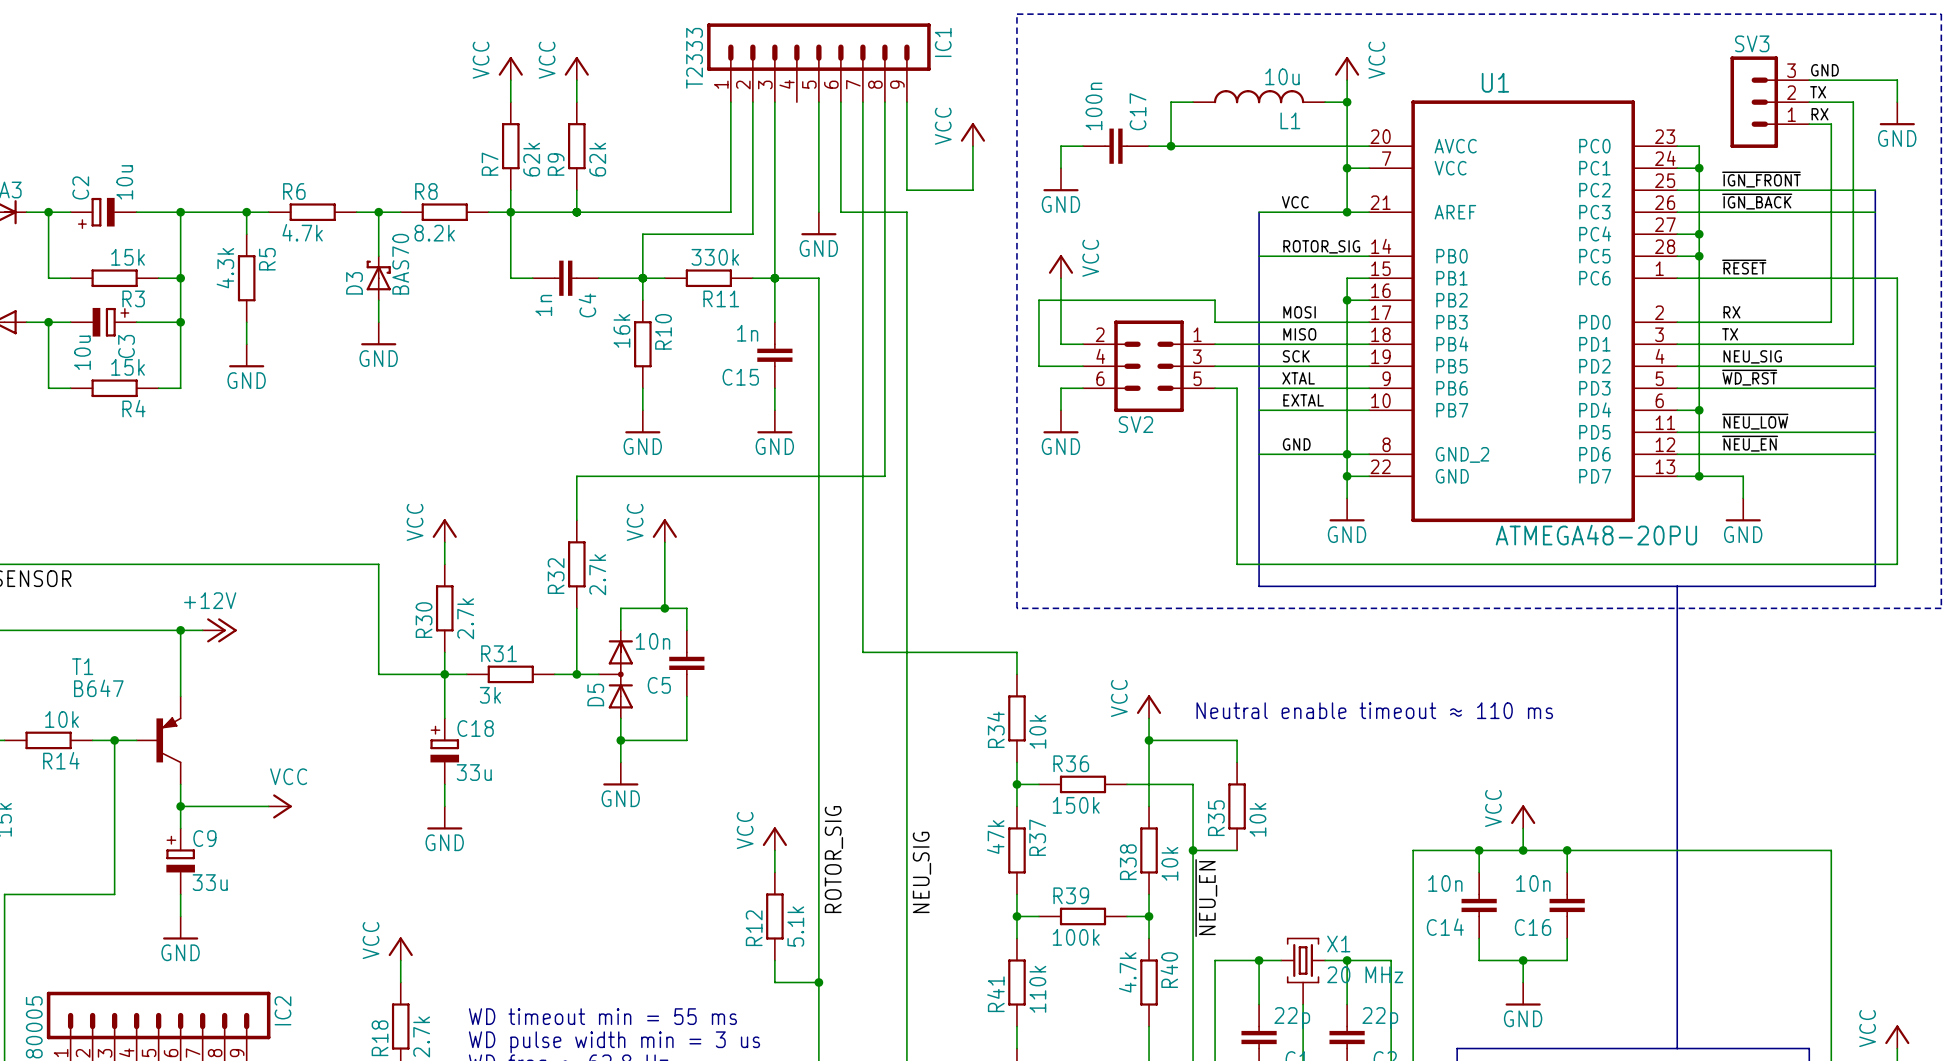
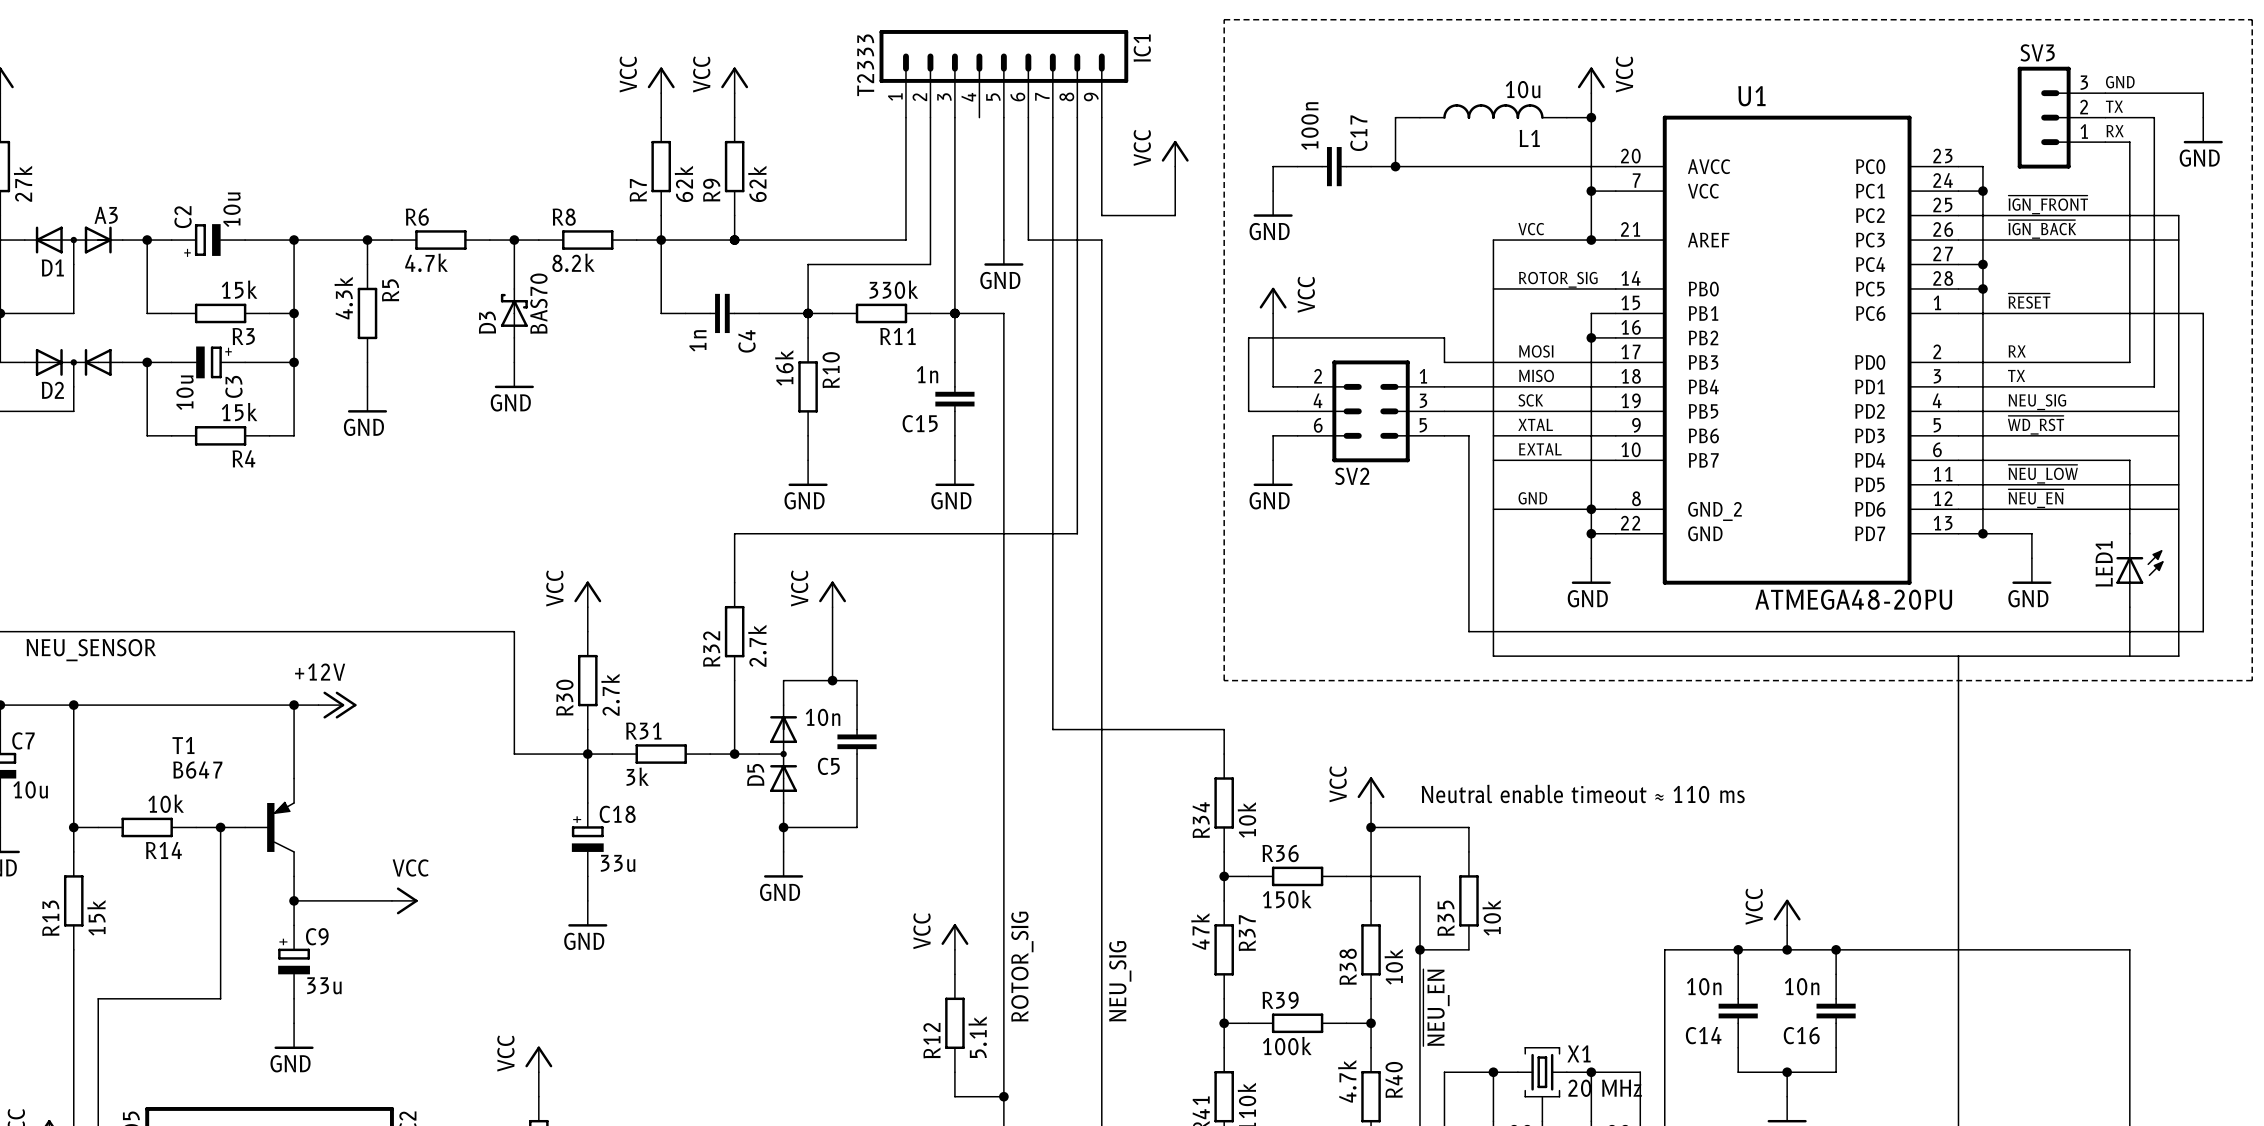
wire: none -> (1982, 460) (2129, 460) (2129, 533)
junction: (1699, 410) -> none
LED1: none -> (2139, 570)
wire: none -> (2129, 607) (2129, 656)

